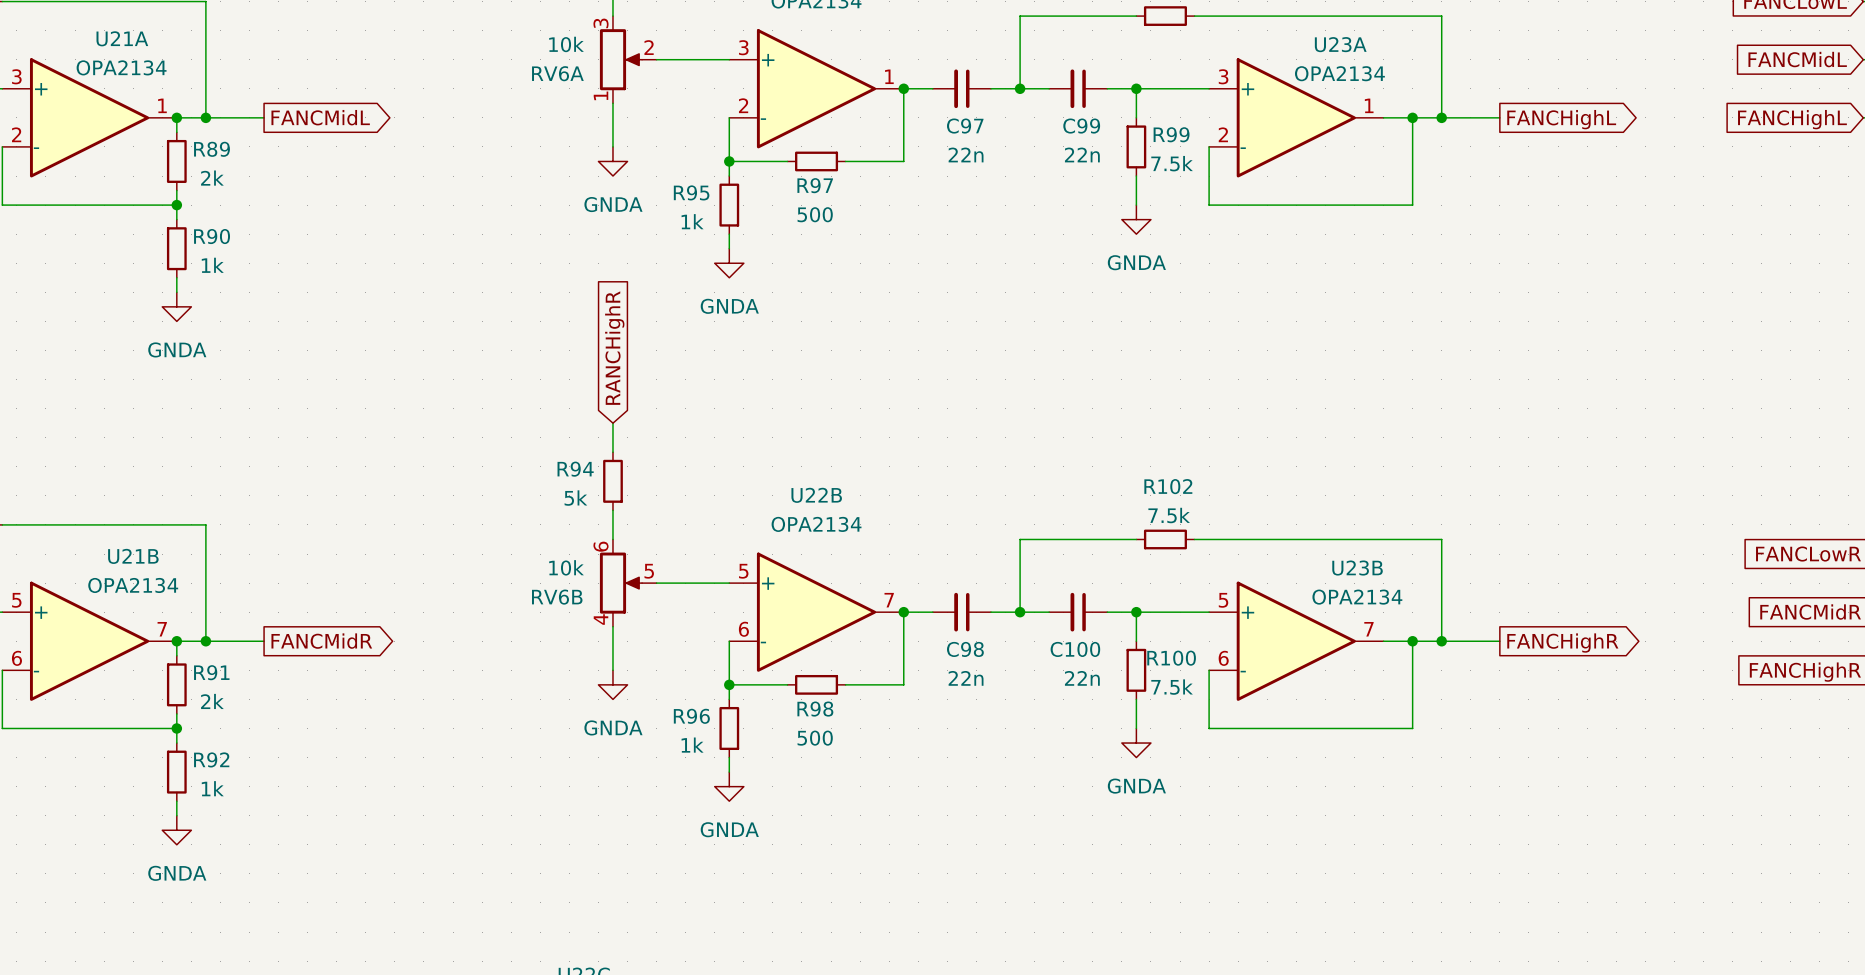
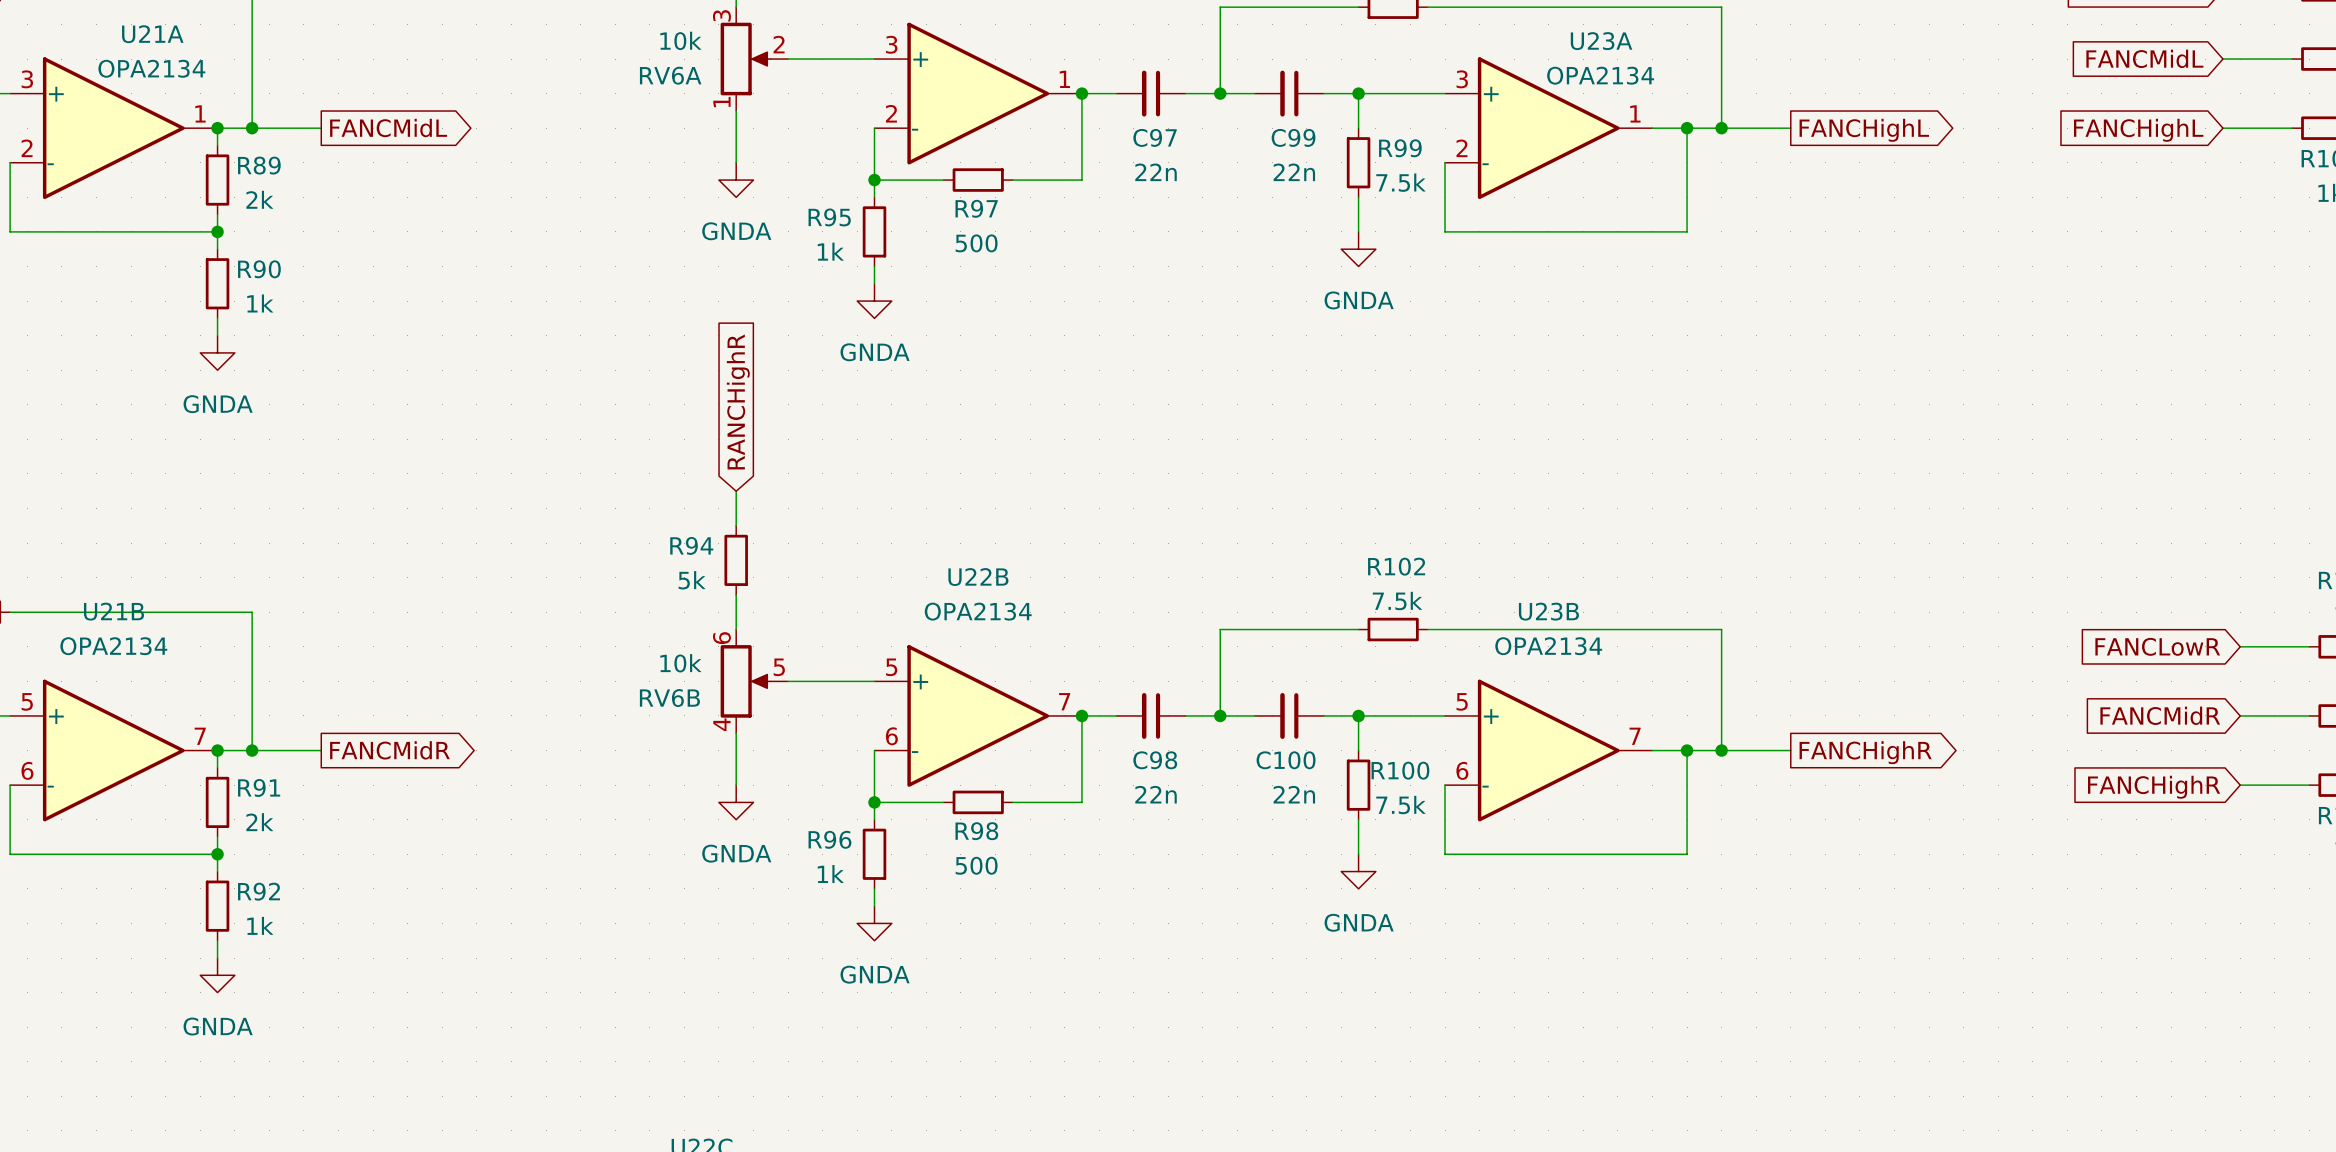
U21B name position: U21B (133, 556) -> U21B (114, 611)
U23B name position: U23B (1357, 568) -> U23B (1548, 611)
U21B value position: OPA2134 (133, 585) -> OPA2134 (113, 646)
U23B value position: OPA2134 (1357, 597) -> OPA2134 (1548, 646)

